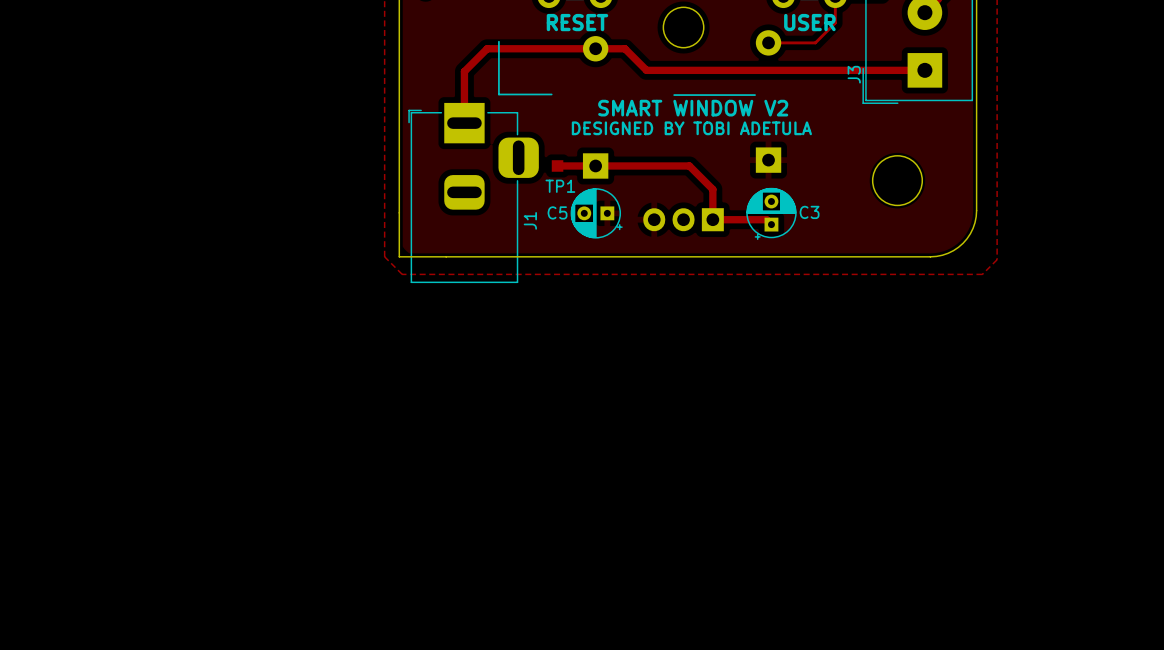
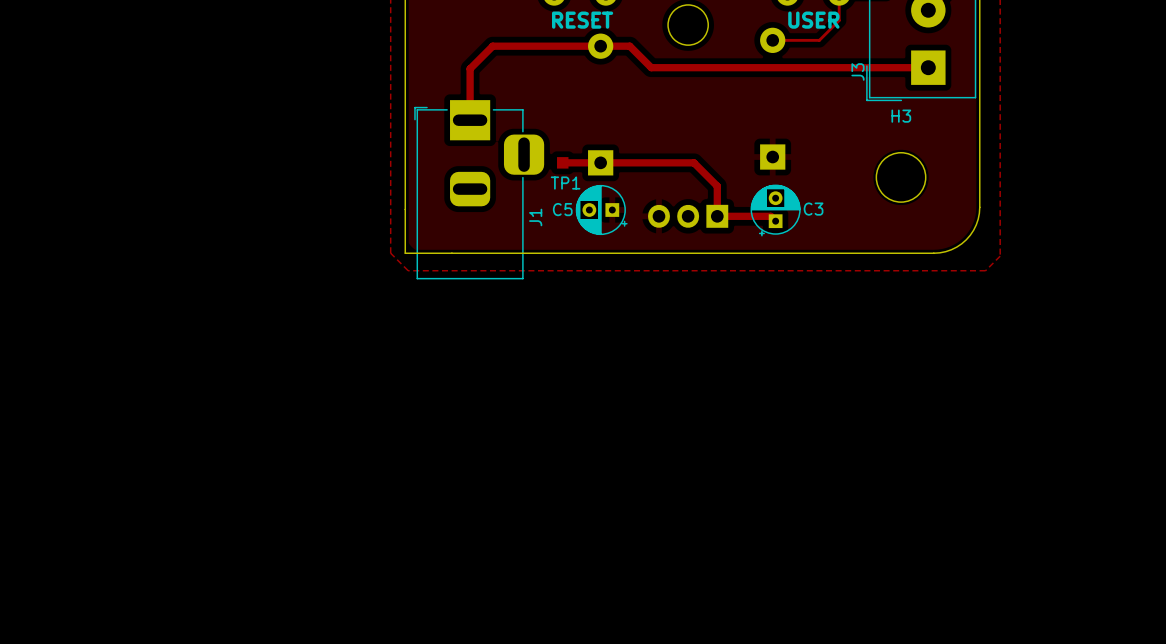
line: (498, 41) (498, 94) (551, 94) -> none
line: (674, 95) (755, 95) -> none
text: SMART WINDOW V2 (693, 108) -> none
H3 name: none -> H3 (901, 116)
text: DESIGNED BY TOBI ADETULA (691, 128) -> none

